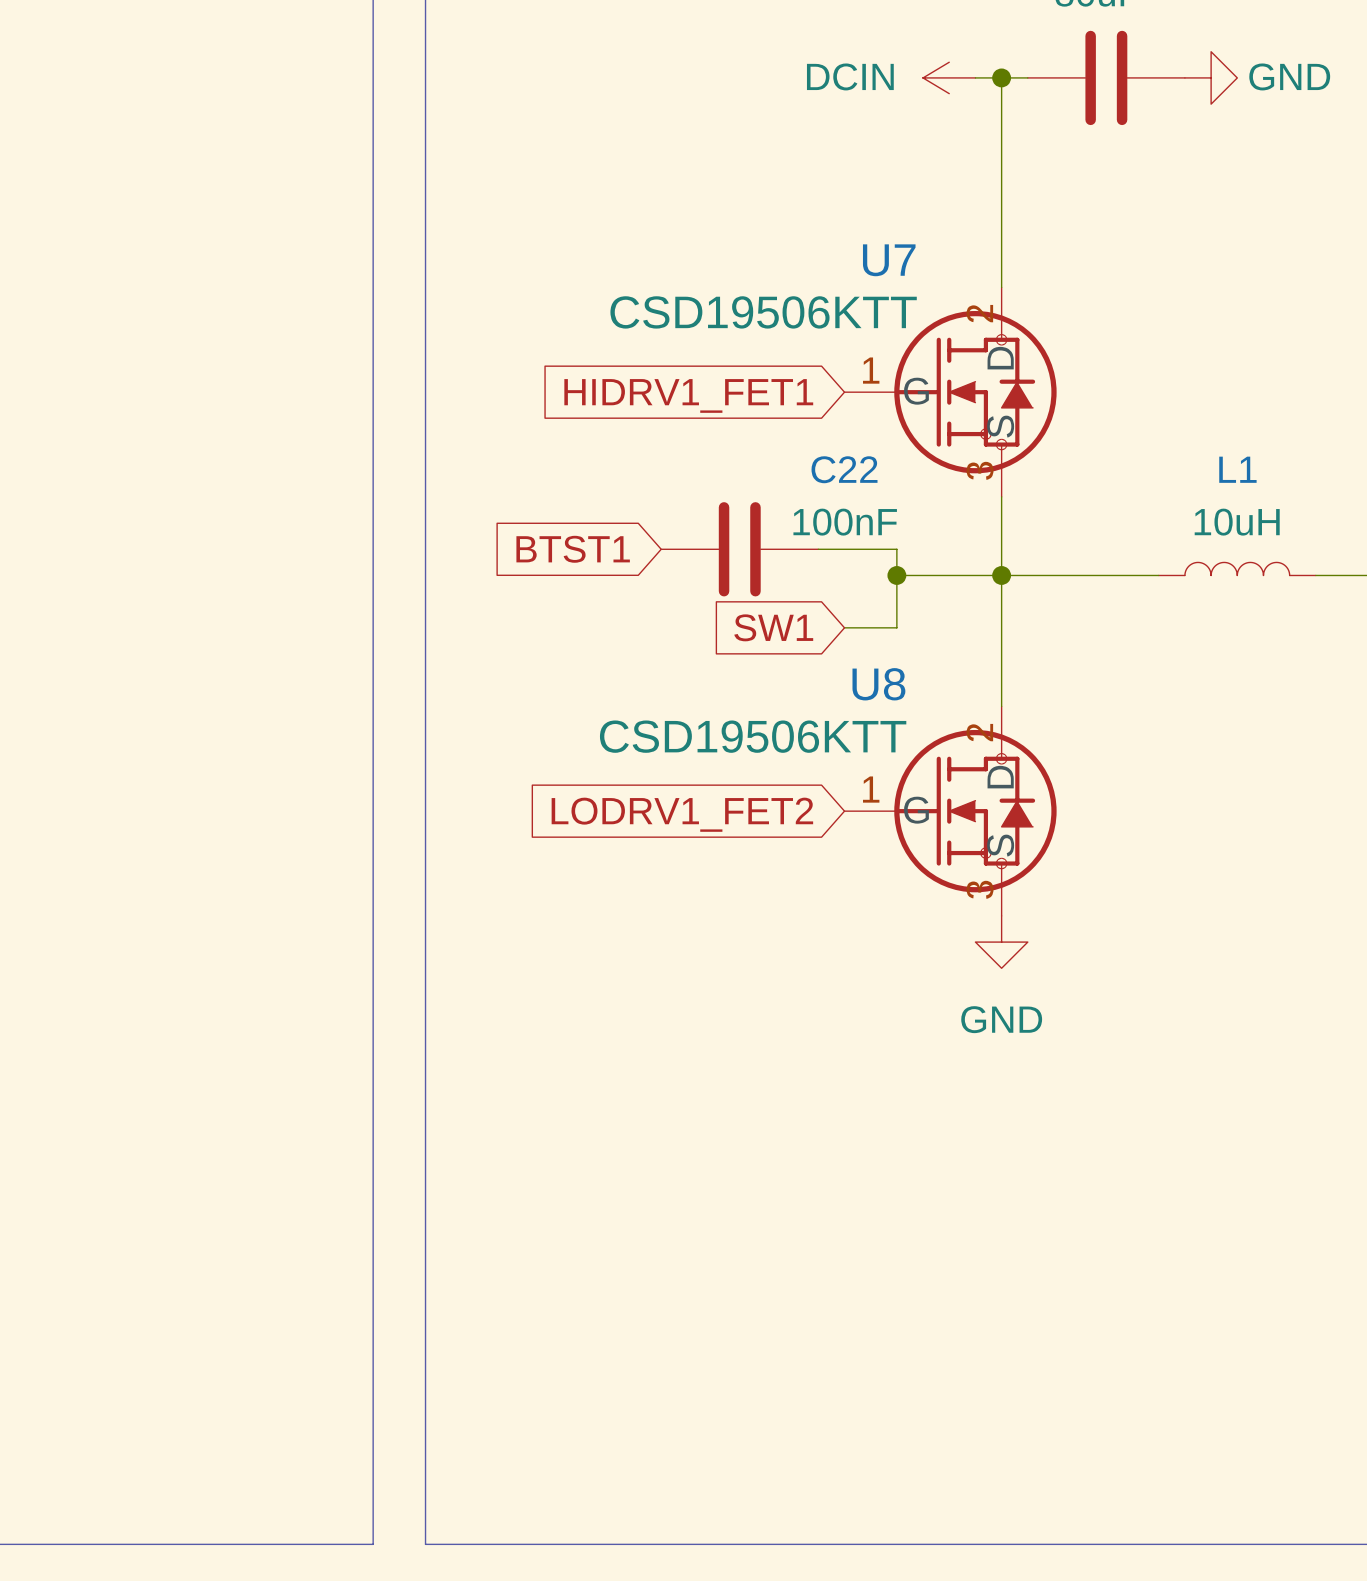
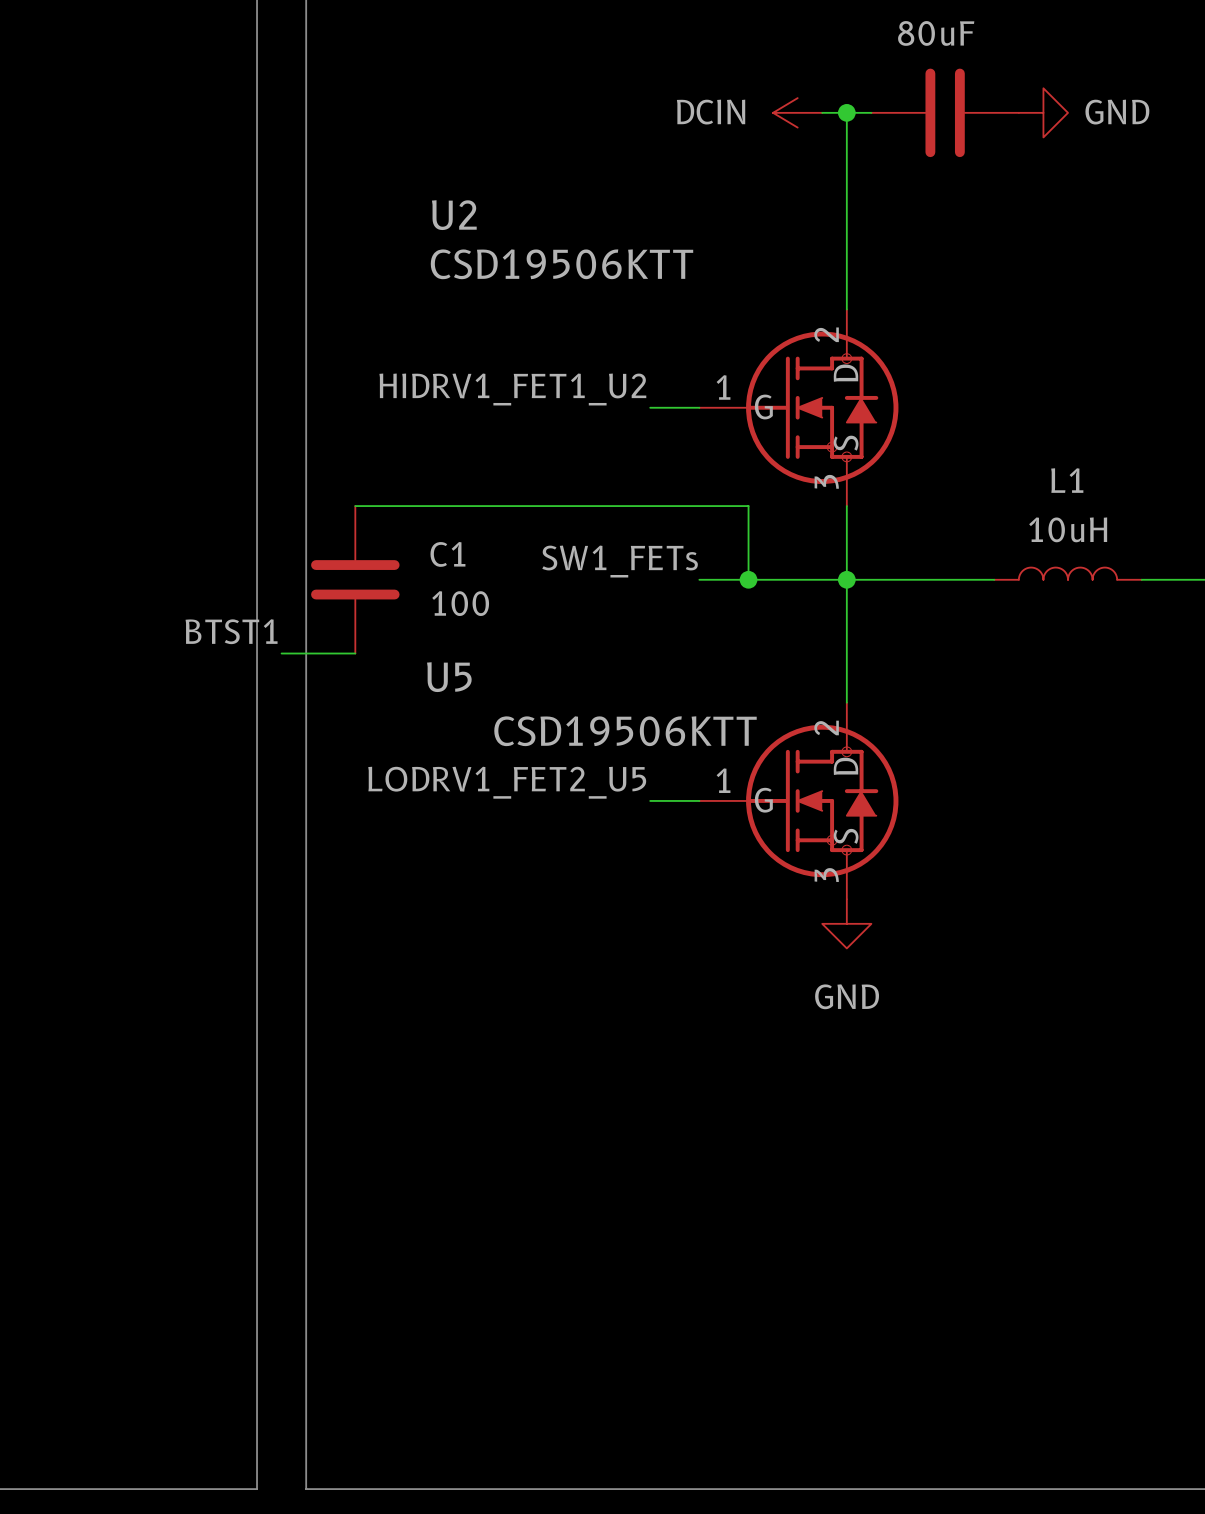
U7 name: U7 (889, 260) -> U2 (454, 215)
U7 value position: CSD19506KTT (763, 312) -> CSD19506KTT (561, 264)
label: none -> HIDRV1_FET1_U2 (512, 389)
wire: none -> (650, 407) (699, 407)
global label: HIDRV1_FET1 (688, 395) -> none
global label: BTST1 (573, 549) -> none
C22: 100nF (739, 549) -> none
wire: (818, 549) (896, 549) -> (355, 506) (748, 506) (748, 555)
label: none -> SW1_FETs (620, 561)
C1: none -> 100 (355, 579)
wire: (896, 575) (896, 627) (844, 627) -> (748, 579) (699, 579)
global label: SW1 (773, 627) -> none
label: none -> BTST1 (231, 631)
wire: none -> (281, 653) (355, 653)
U8 name: U8 (878, 684) -> U5 (449, 677)
label: none -> LODRV1_FET2_U5 (507, 782)
wire: none -> (650, 800) (699, 800)
global label: LODRV1_FET2 (682, 814) -> none

